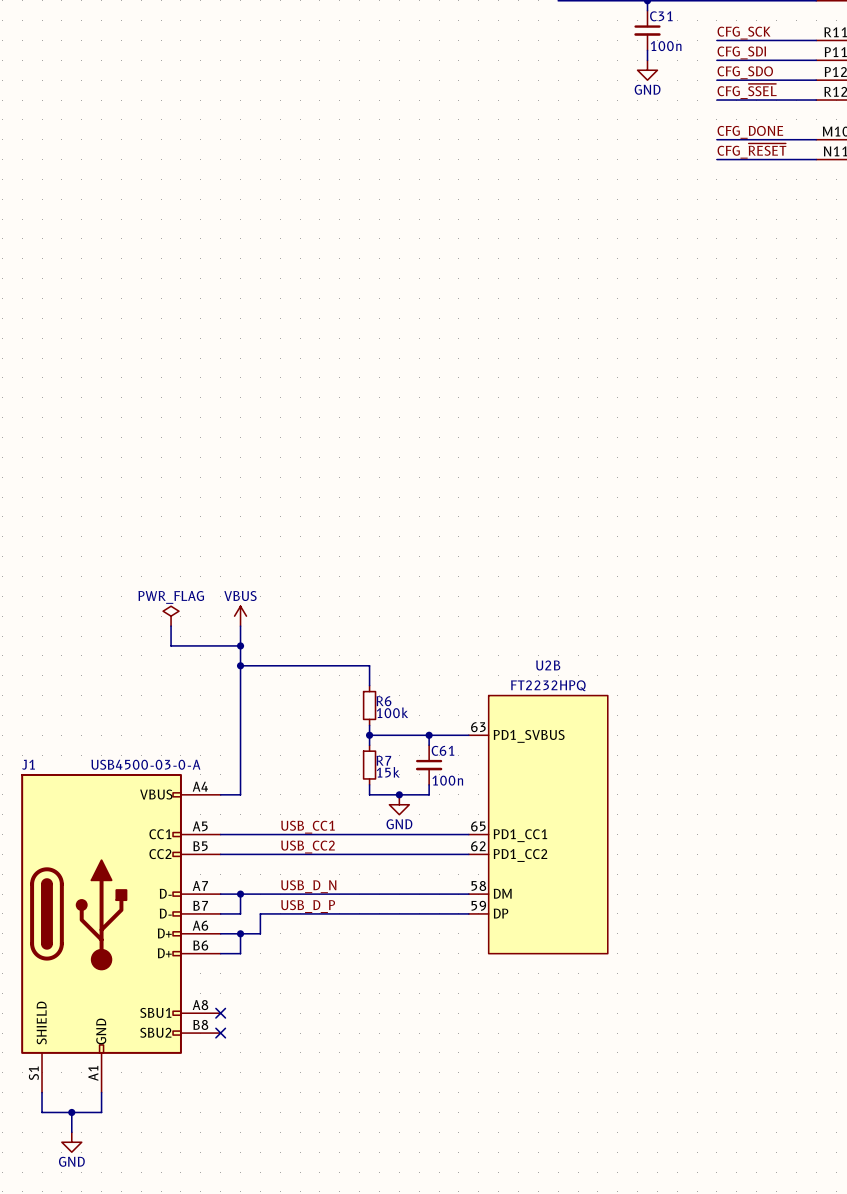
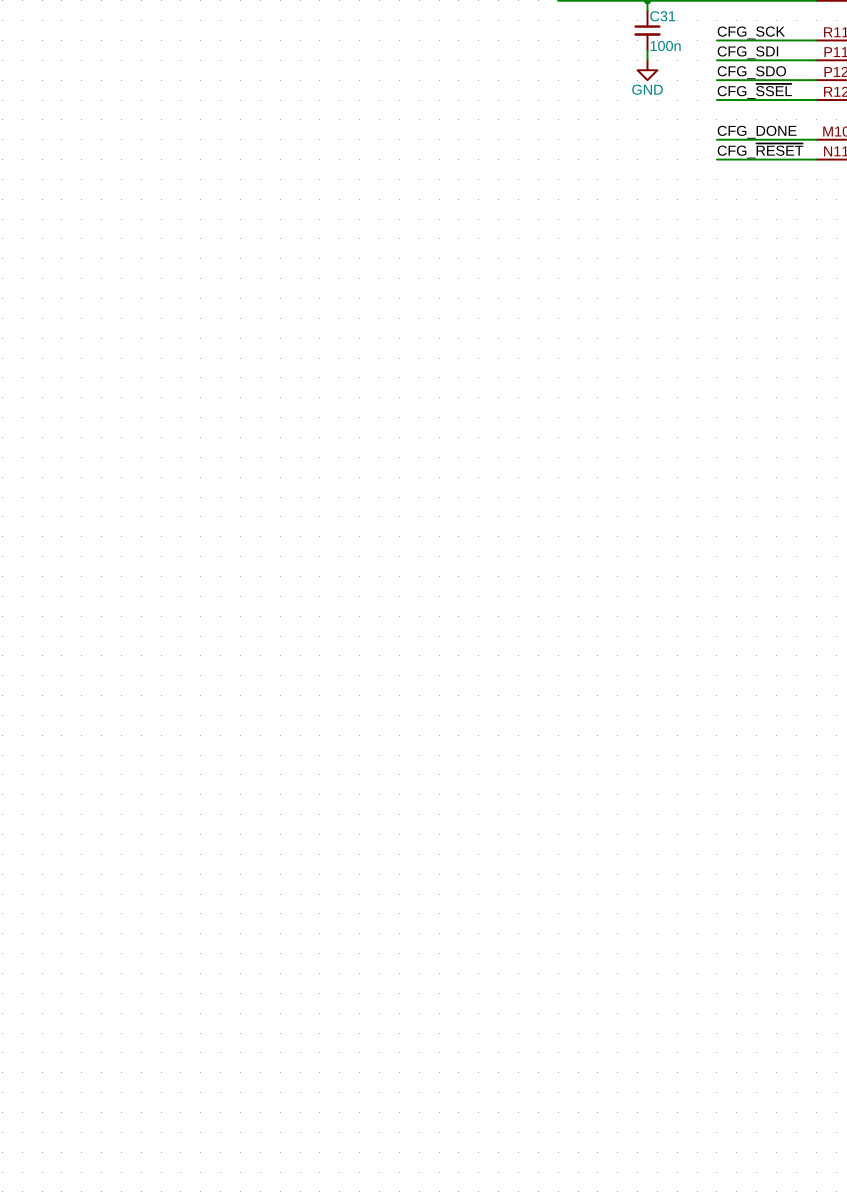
power symbol: PWR_FLAG (171, 616) -> none
power symbol: VBUS (240, 616) -> none
wire: (171, 626) (171, 645) (240, 645) -> none
wire: (240, 626) (240, 794) (220, 794) -> none
junction: (240, 645) -> none
wire: (240, 665) (369, 665) (369, 685) -> none
junction: (240, 665) -> none
R6: 100k (369, 705) -> none
wire: (369, 725) (369, 745) -> none
wire: (369, 735) (468, 735) -> none
junction: (369, 735) -> none
wire: (429, 735) (429, 745) -> none
junction: (429, 735) -> none
R7: 15k (369, 765) -> none
C61: 100n (429, 765) -> none
wire: (369, 784) (369, 794) (429, 794) (429, 784) -> none
junction: (399, 794) -> none
power symbol: GND (399, 804) -> none
U2B: FT2232HPQ (538, 824) -> none
label: USB_CC1 (307, 827) -> none
wire: (220, 834) (468, 834) -> none
label: USB_CC2 (308, 847) -> none
wire: (220, 854) (468, 854) -> none
label: USB_D_N (308, 886) -> none
wire: (220, 894) (468, 894) -> none
wire: (240, 894) (240, 913) (220, 913) -> none
junction: (240, 894) -> none
label: USB_D_P (308, 906) -> none
wire: (468, 913) (260, 913) (260, 933) (220, 933) -> none
J1: USB4500-03-0-A (120, 933) -> none
wire: (240, 933) (240, 953) (220, 953) -> none
junction: (240, 933) -> none
no-connect mark: (220, 1013) -> none
no-connect mark: (220, 1033) -> none
wire: (42, 1092) (42, 1112) (101, 1112) (101, 1092) -> none
wire: (71, 1112) (71, 1132) -> none
junction: (71, 1112) -> none
power symbol: GND (71, 1142) -> none

